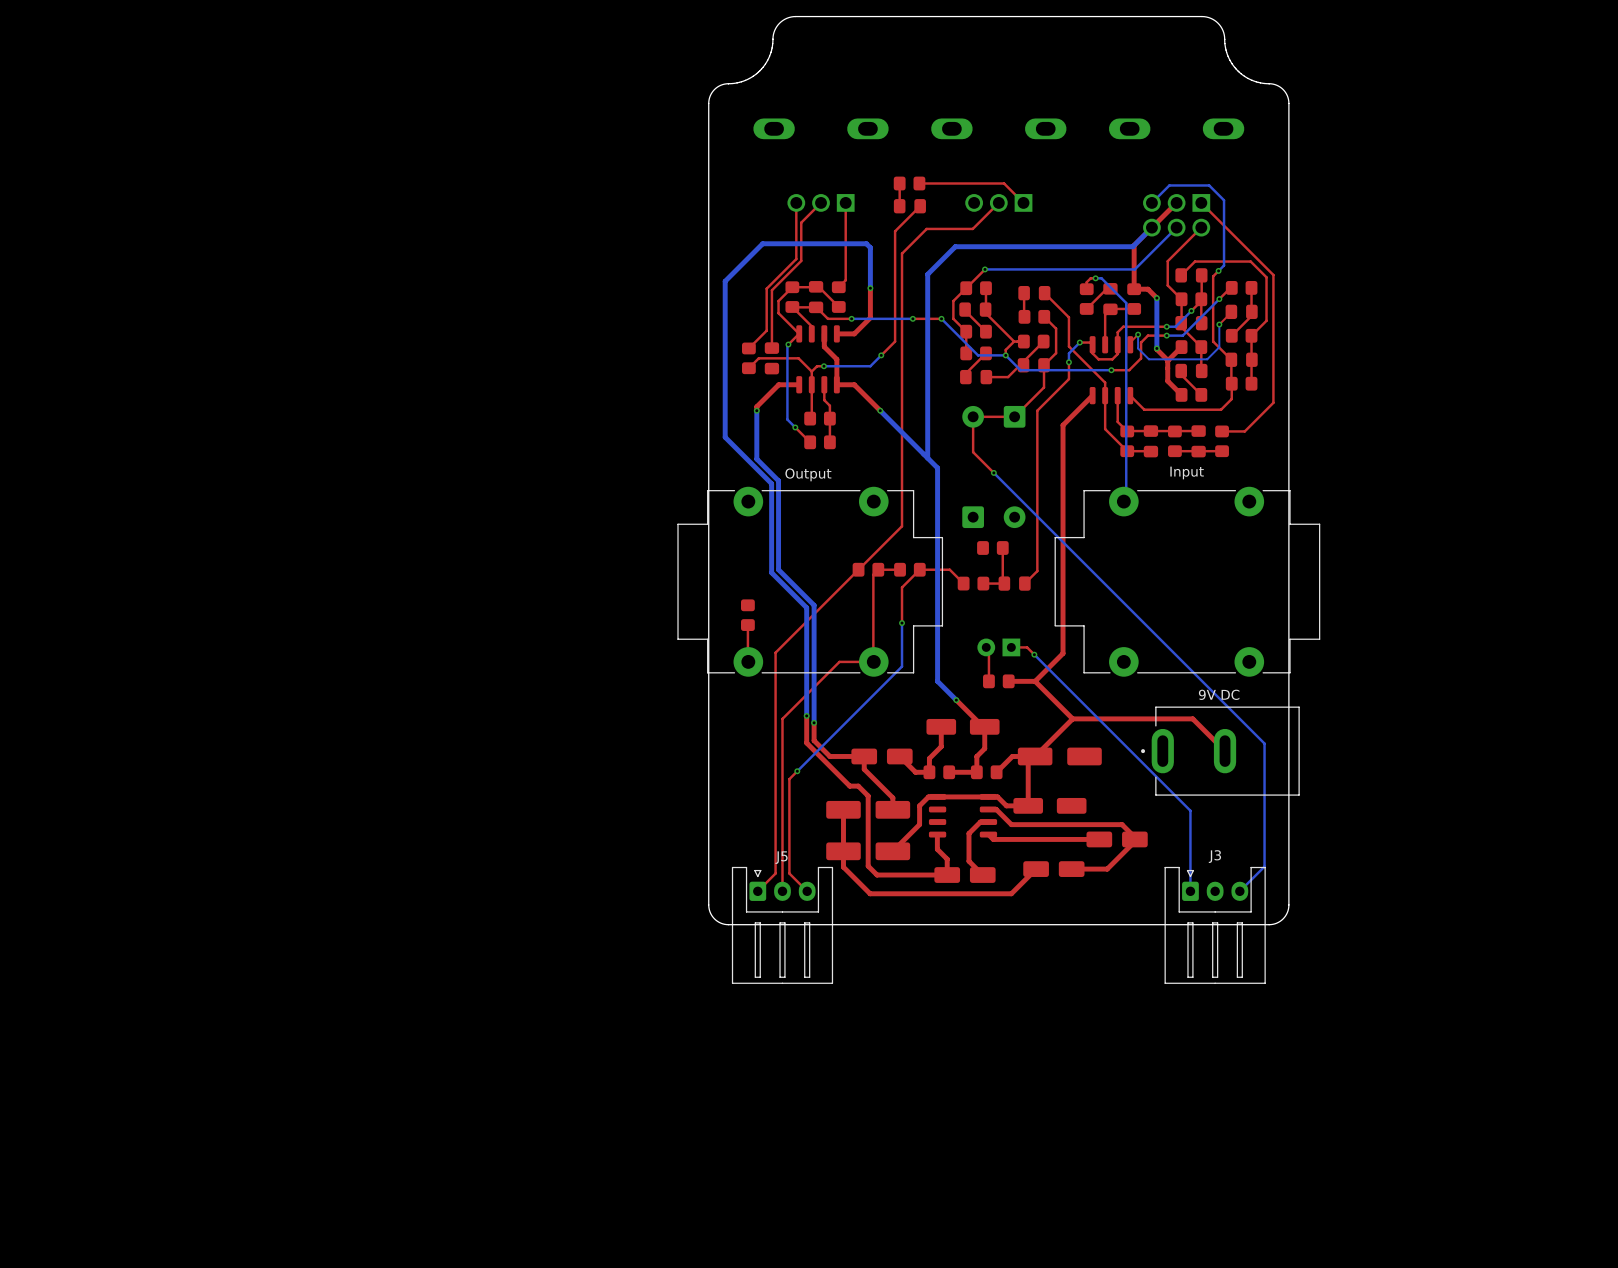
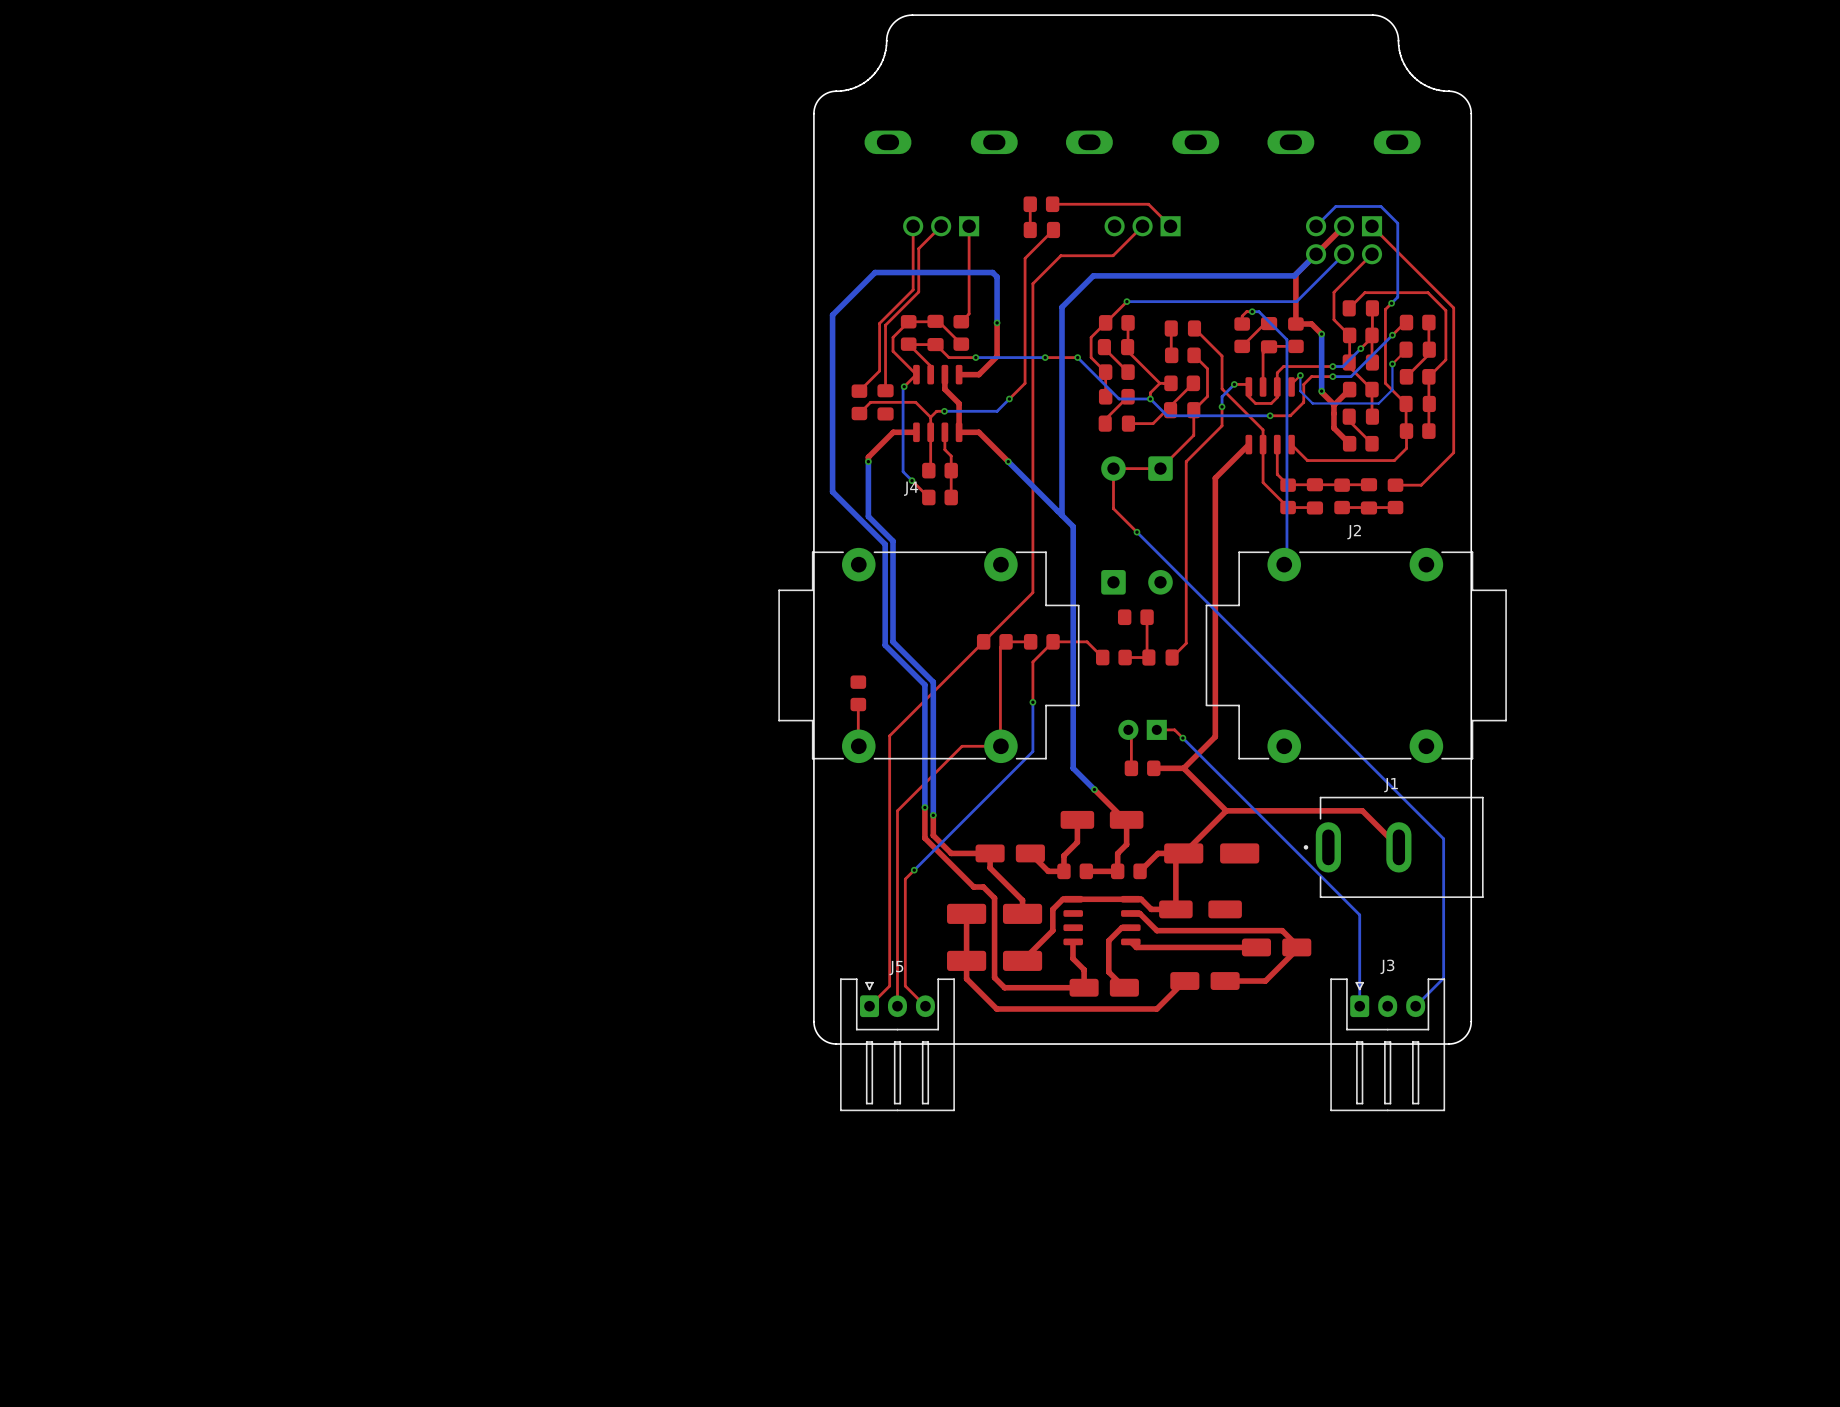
Input name: Input (1187, 472) -> J2 (1354, 532)
Output name: Output (808, 474) -> J4 (911, 488)
9V DC name: 9V DC (1219, 694) -> J1 (1391, 785)

